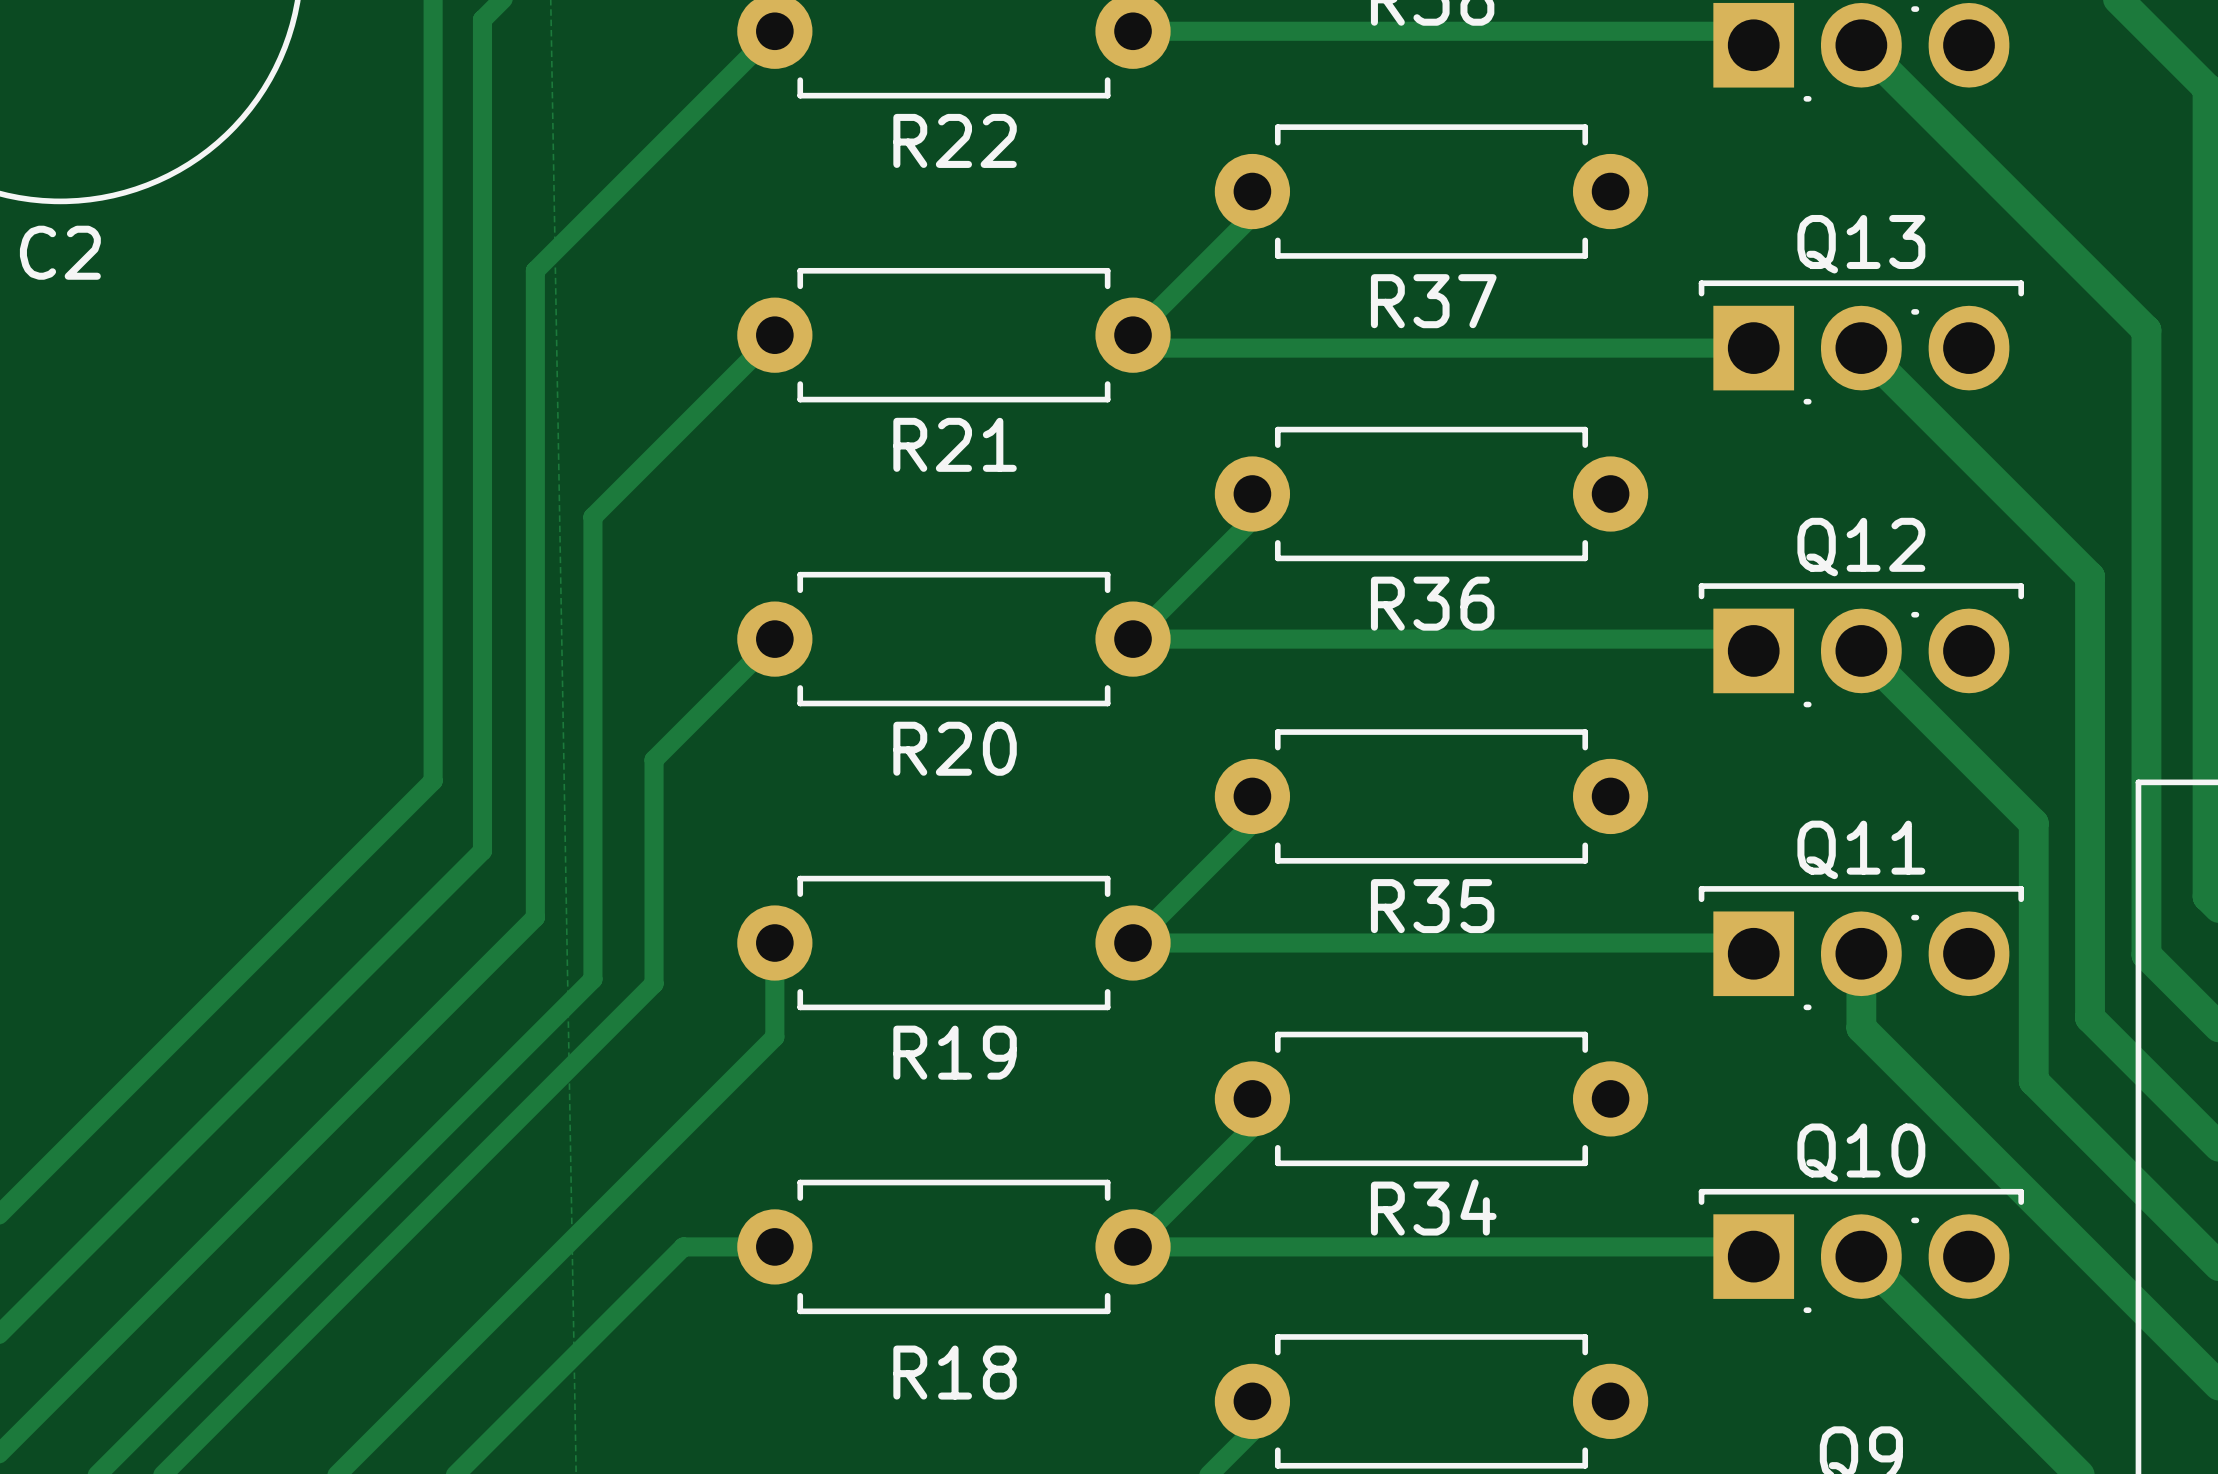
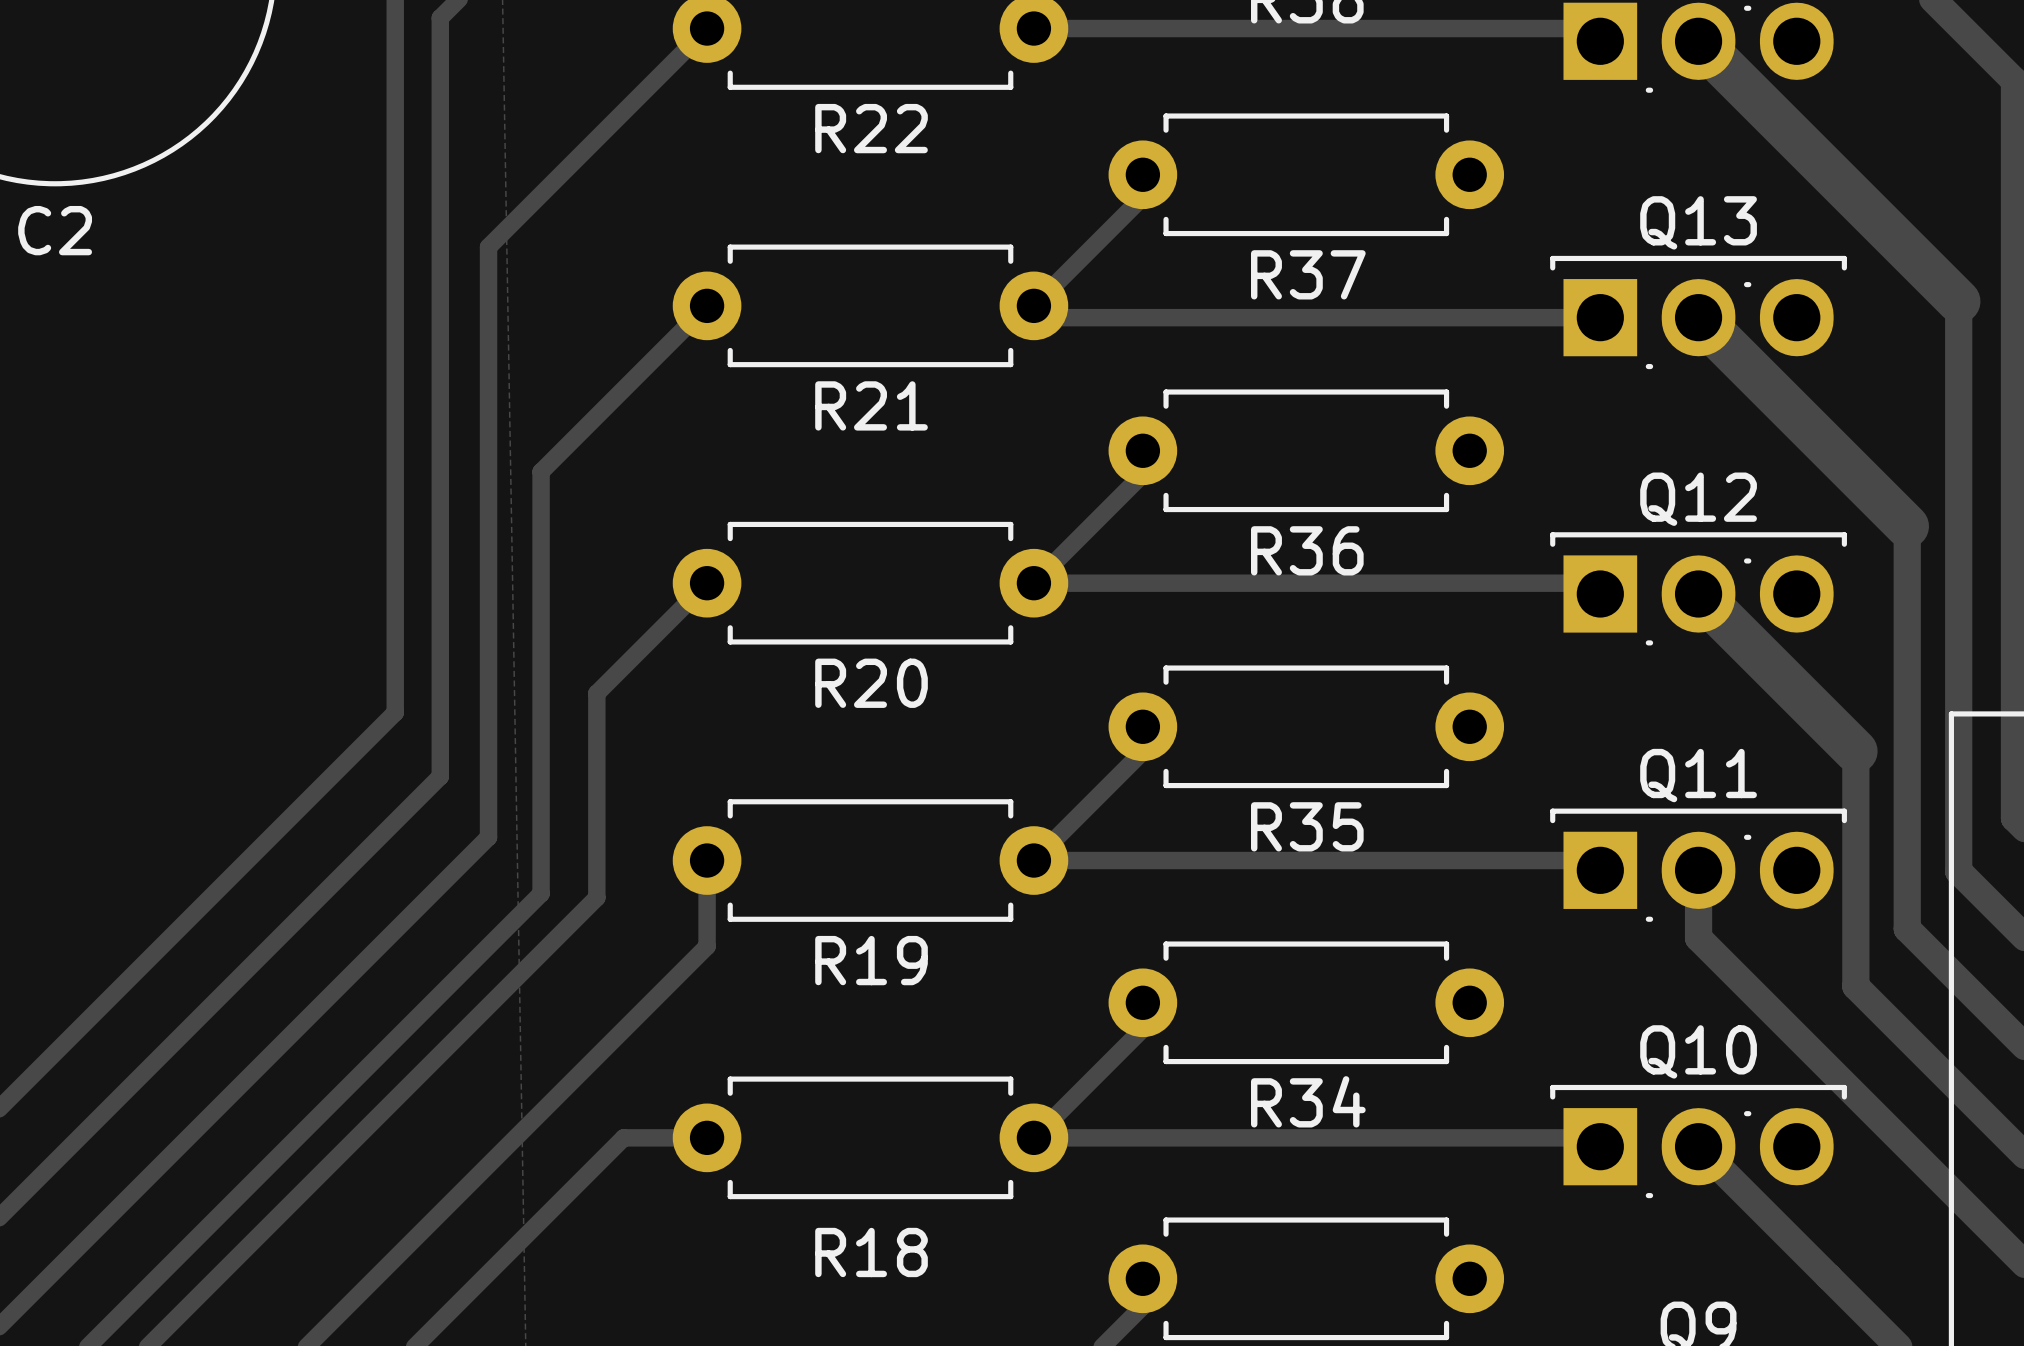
track width: thin (1861, 45) (2146, 330) -> thick (1698, 41) (1958, 301)
track width: thin (1861, 348) (2090, 576) -> thick (1698, 317) (1907, 526)
track width: thin (1861, 650) (2033, 823) -> thick (1698, 593) (1855, 751)

